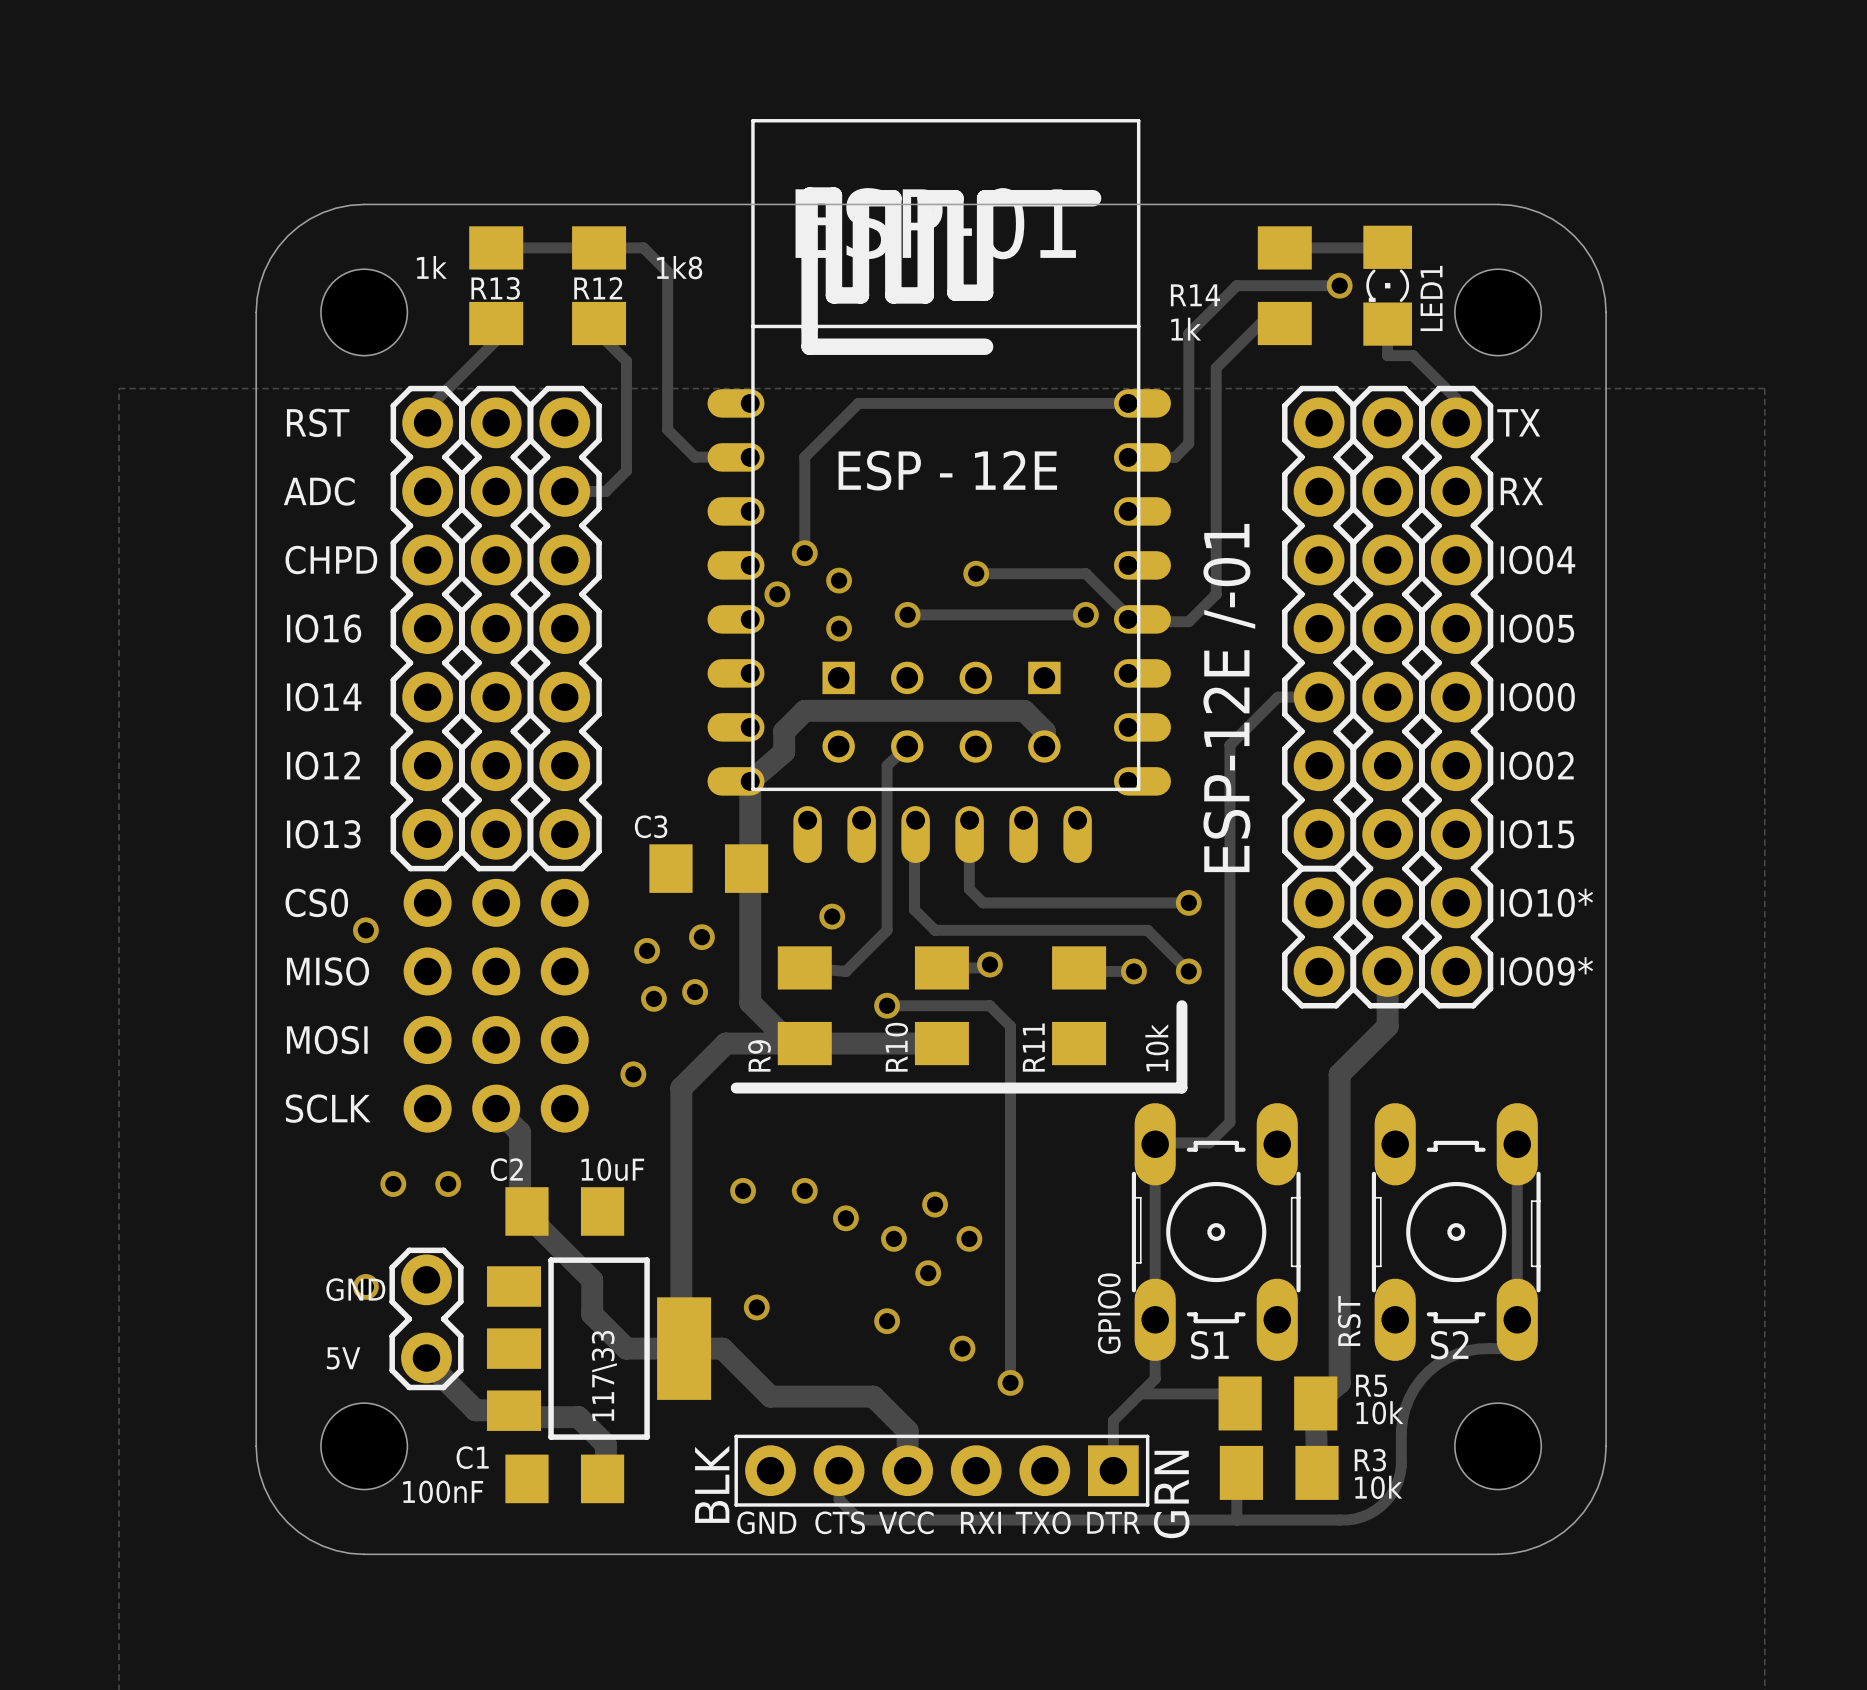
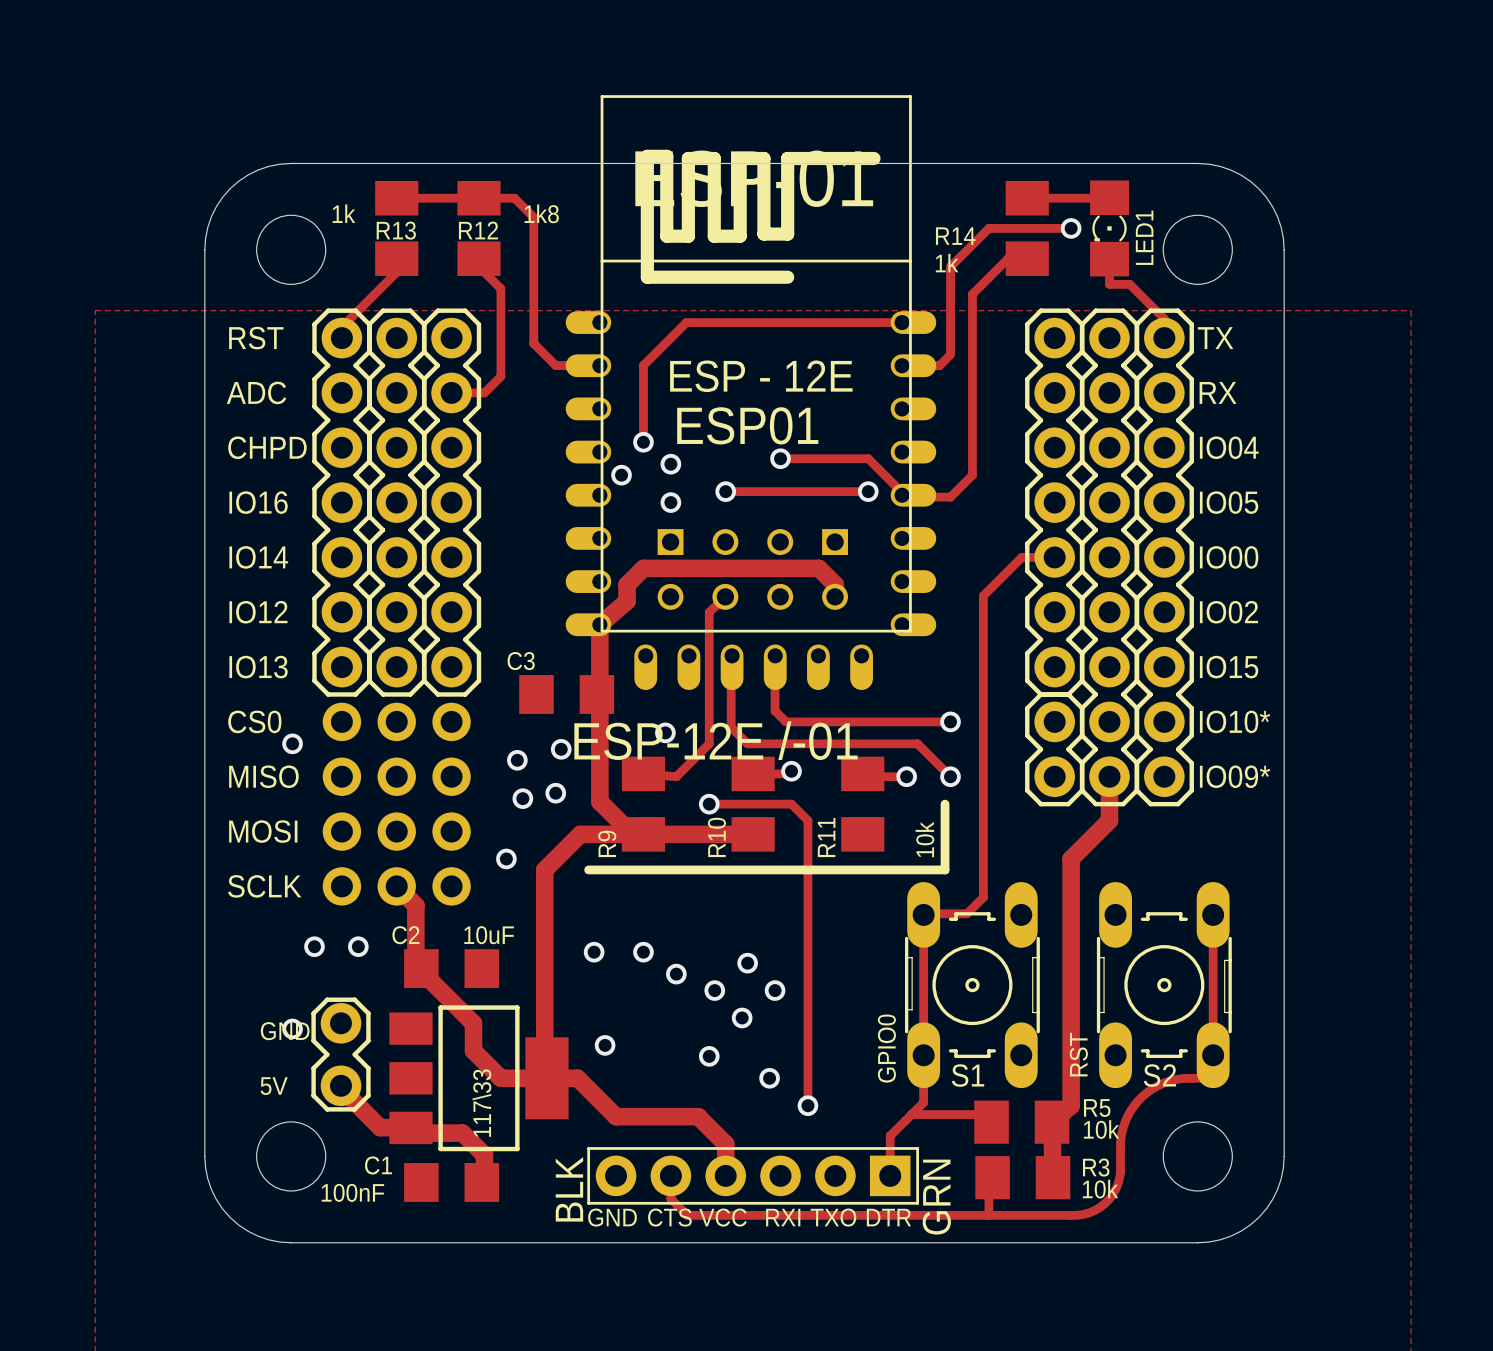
part value: none -> ESP01 (747, 425)
part value rotation: 0° (1229, 698) -> 90° clockwise (715, 740)

